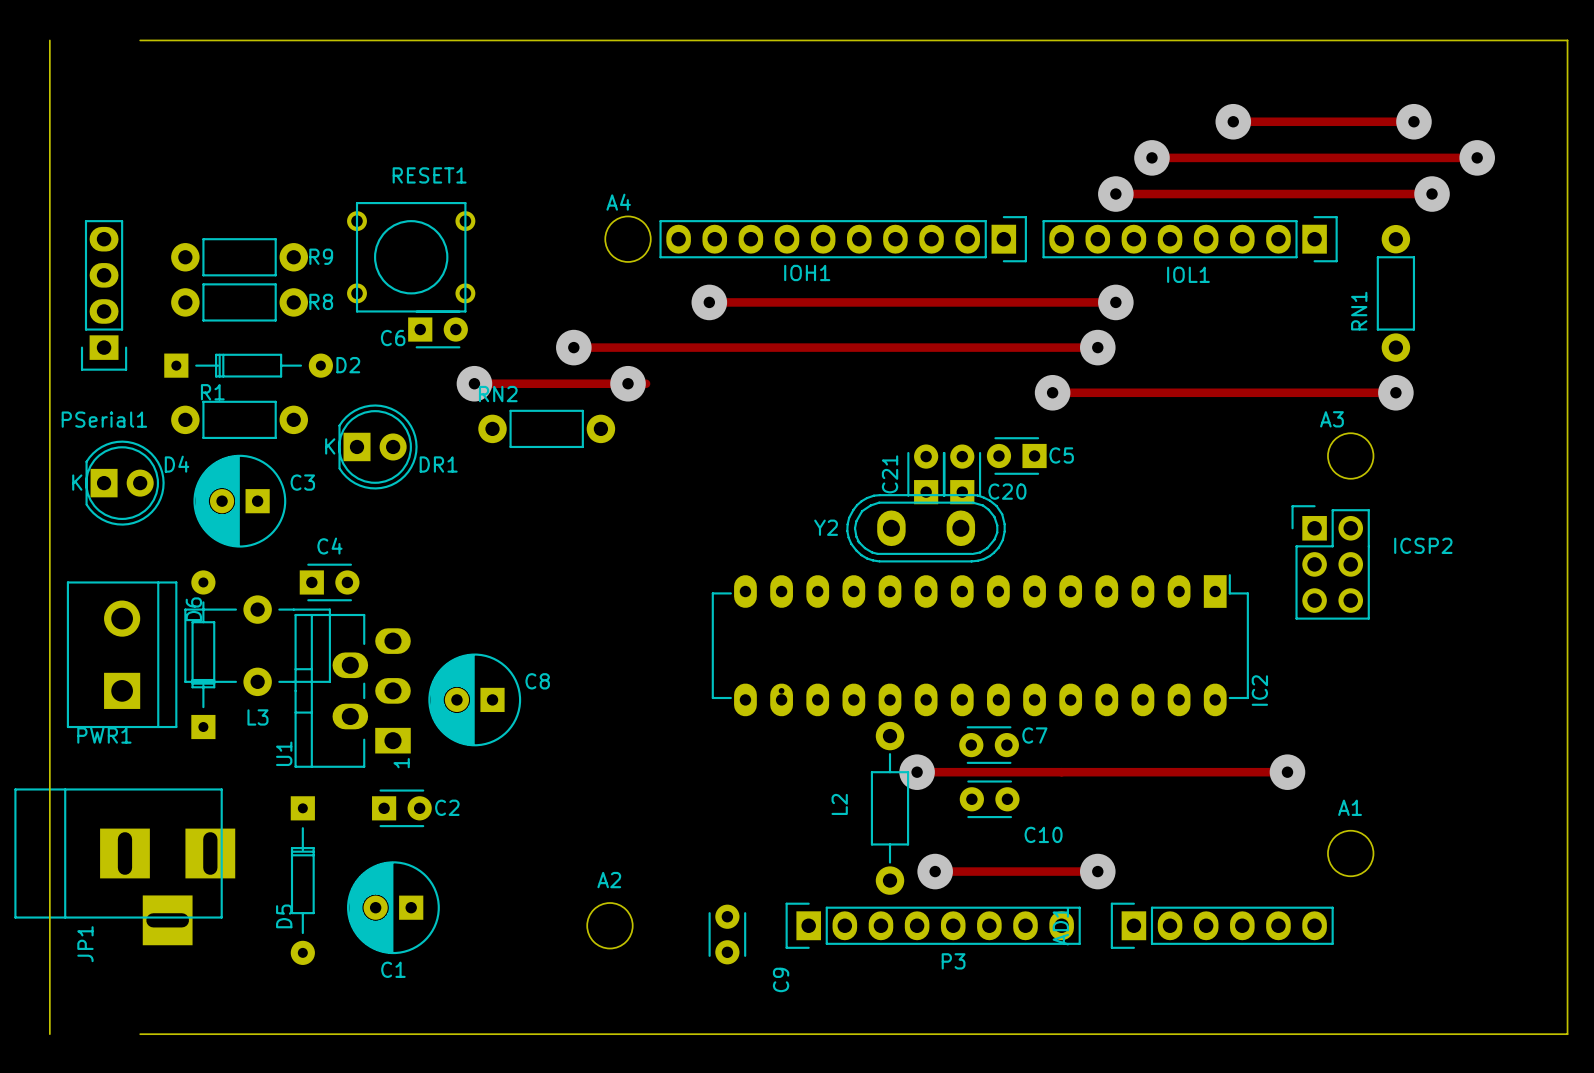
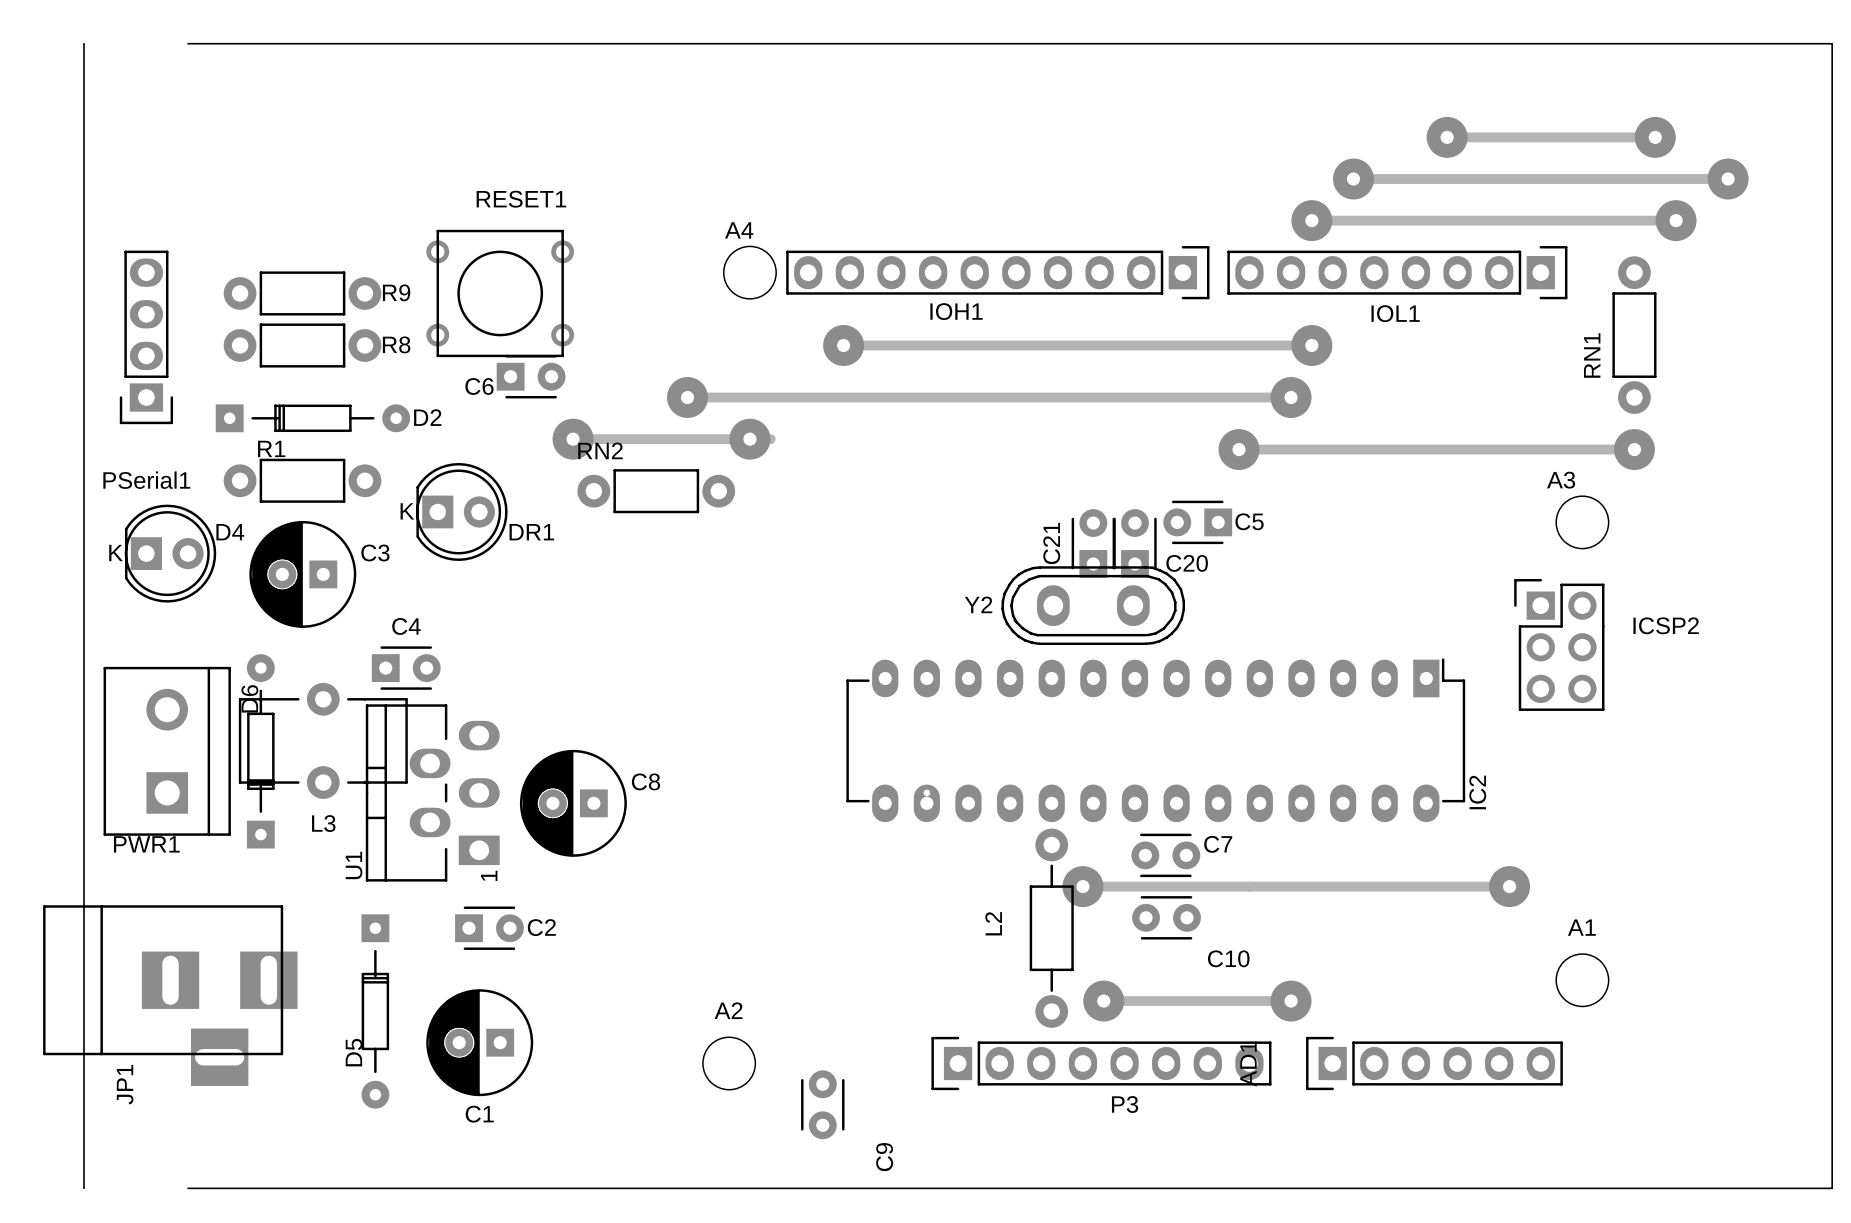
C9 position: (727, 934) -> (822, 1104)

